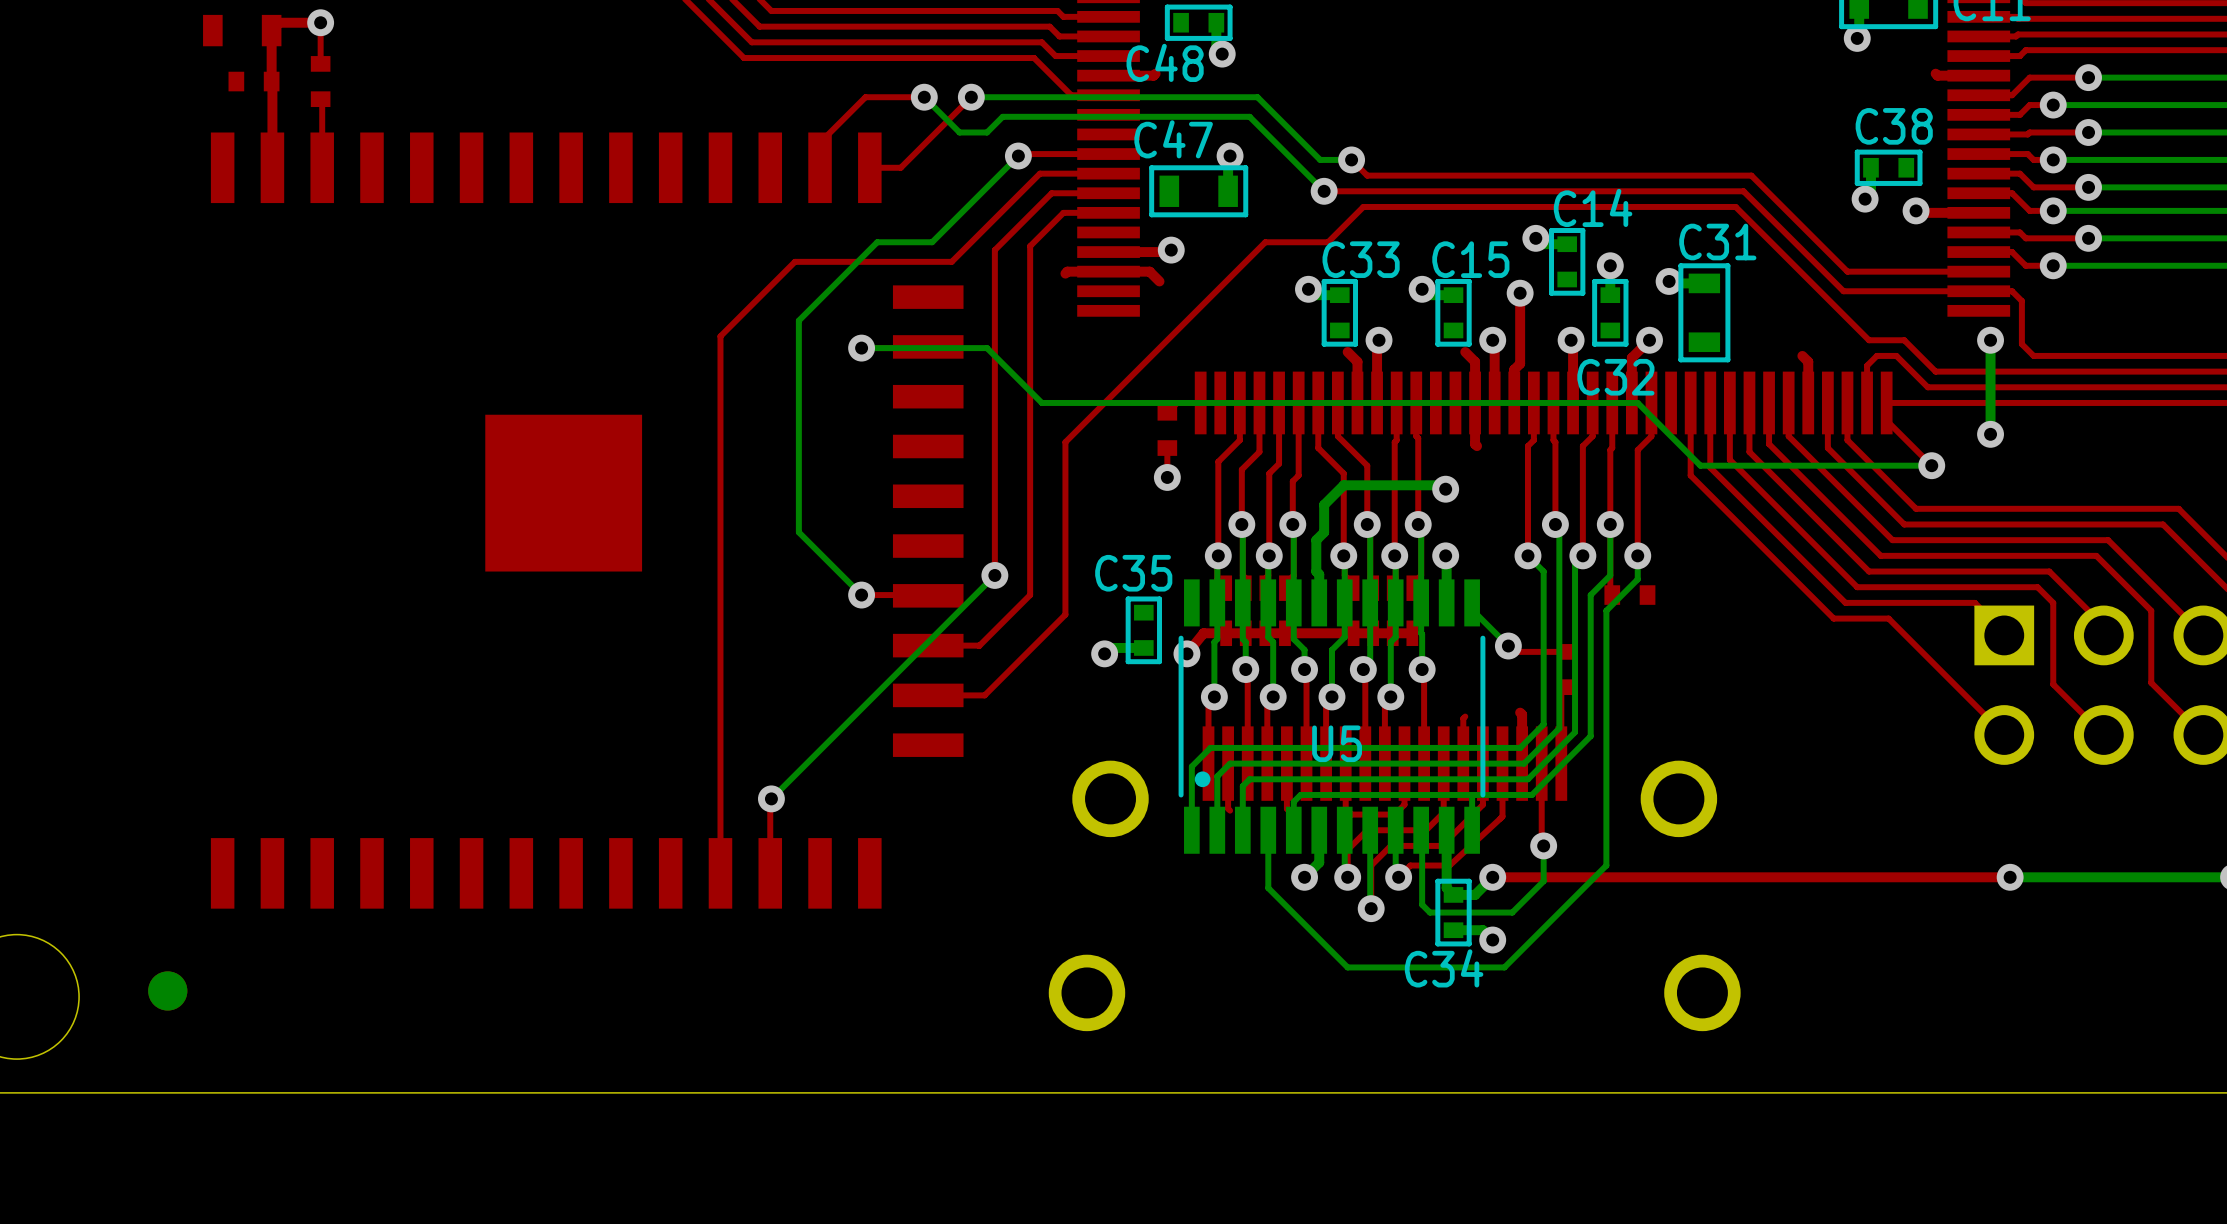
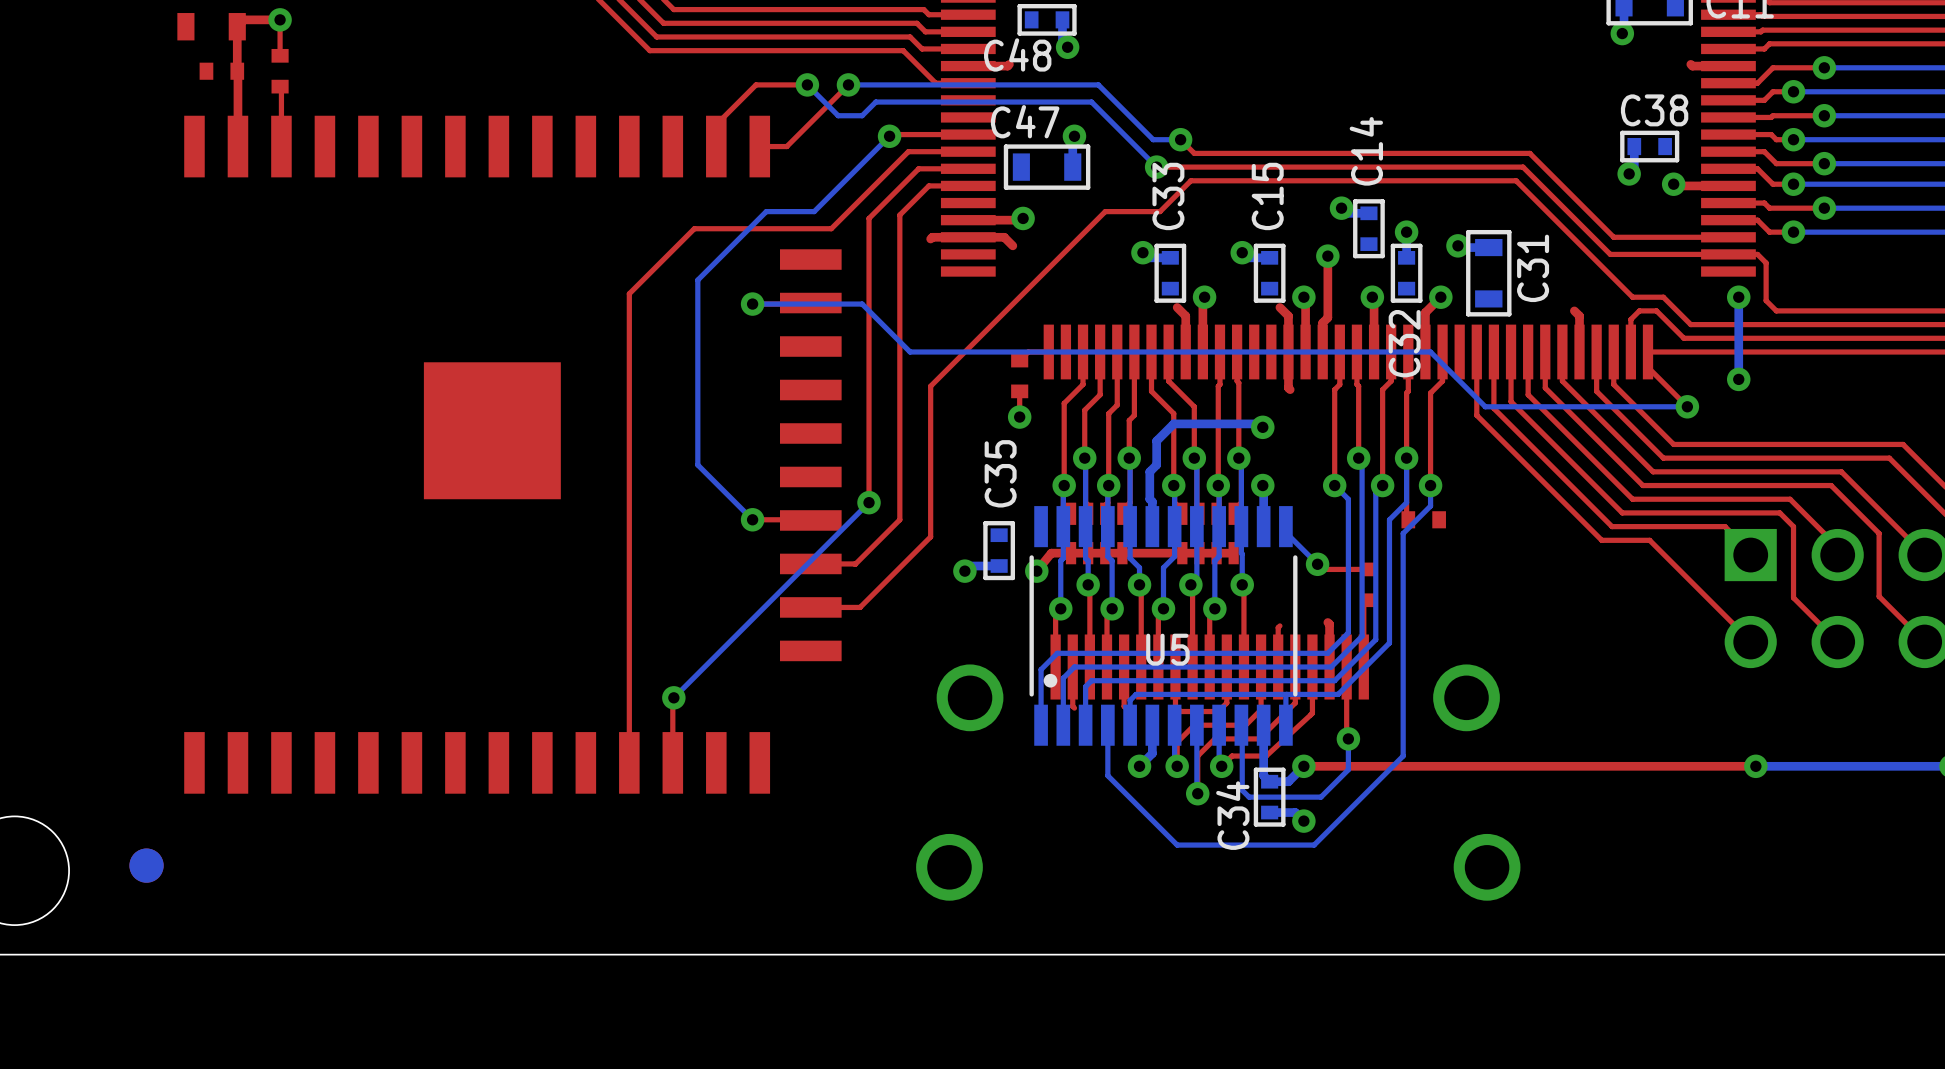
C14 name rotation: 0° (1593, 207) -> 90° counterclockwise (1366, 151)
C31 name rotation: 0° (1717, 242) -> 90° counterclockwise (1533, 268)
C33 name rotation: 0° (1361, 259) -> 90° counterclockwise (1168, 196)
C15 name rotation: 0° (1470, 259) -> 90° counterclockwise (1267, 196)
C32 name rotation: 0° (1615, 377) -> 90° counterclockwise (1404, 343)
C35 name rotation: 0° (1133, 573) -> 90° counterclockwise (1000, 473)
C34 name rotation: 0° (1444, 968) -> 90° counterclockwise (1232, 815)

